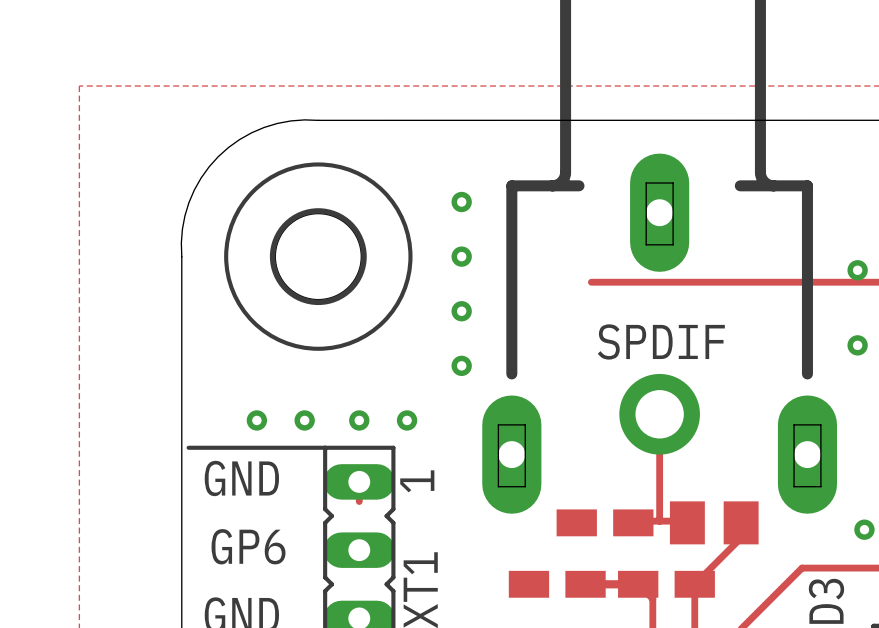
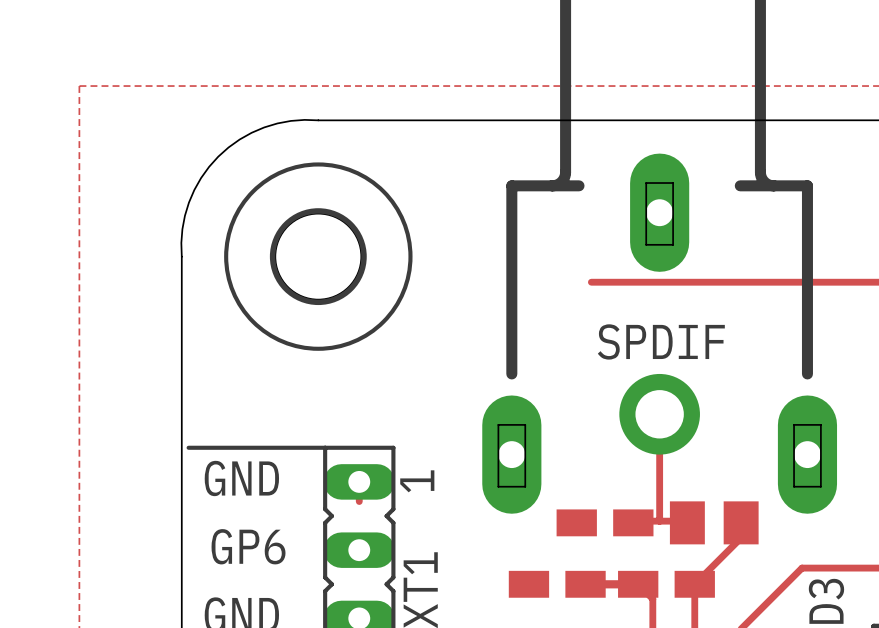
via: (461, 202) -> none
via: (461, 256) -> none
via: (857, 270) -> none
via: (461, 311) -> none
via: (857, 345) -> none
via: (461, 365) -> none
via: (256, 420) -> none
via: (304, 420) -> none
via: (359, 420) -> none
via: (407, 420) -> none
via: (864, 529) -> none

